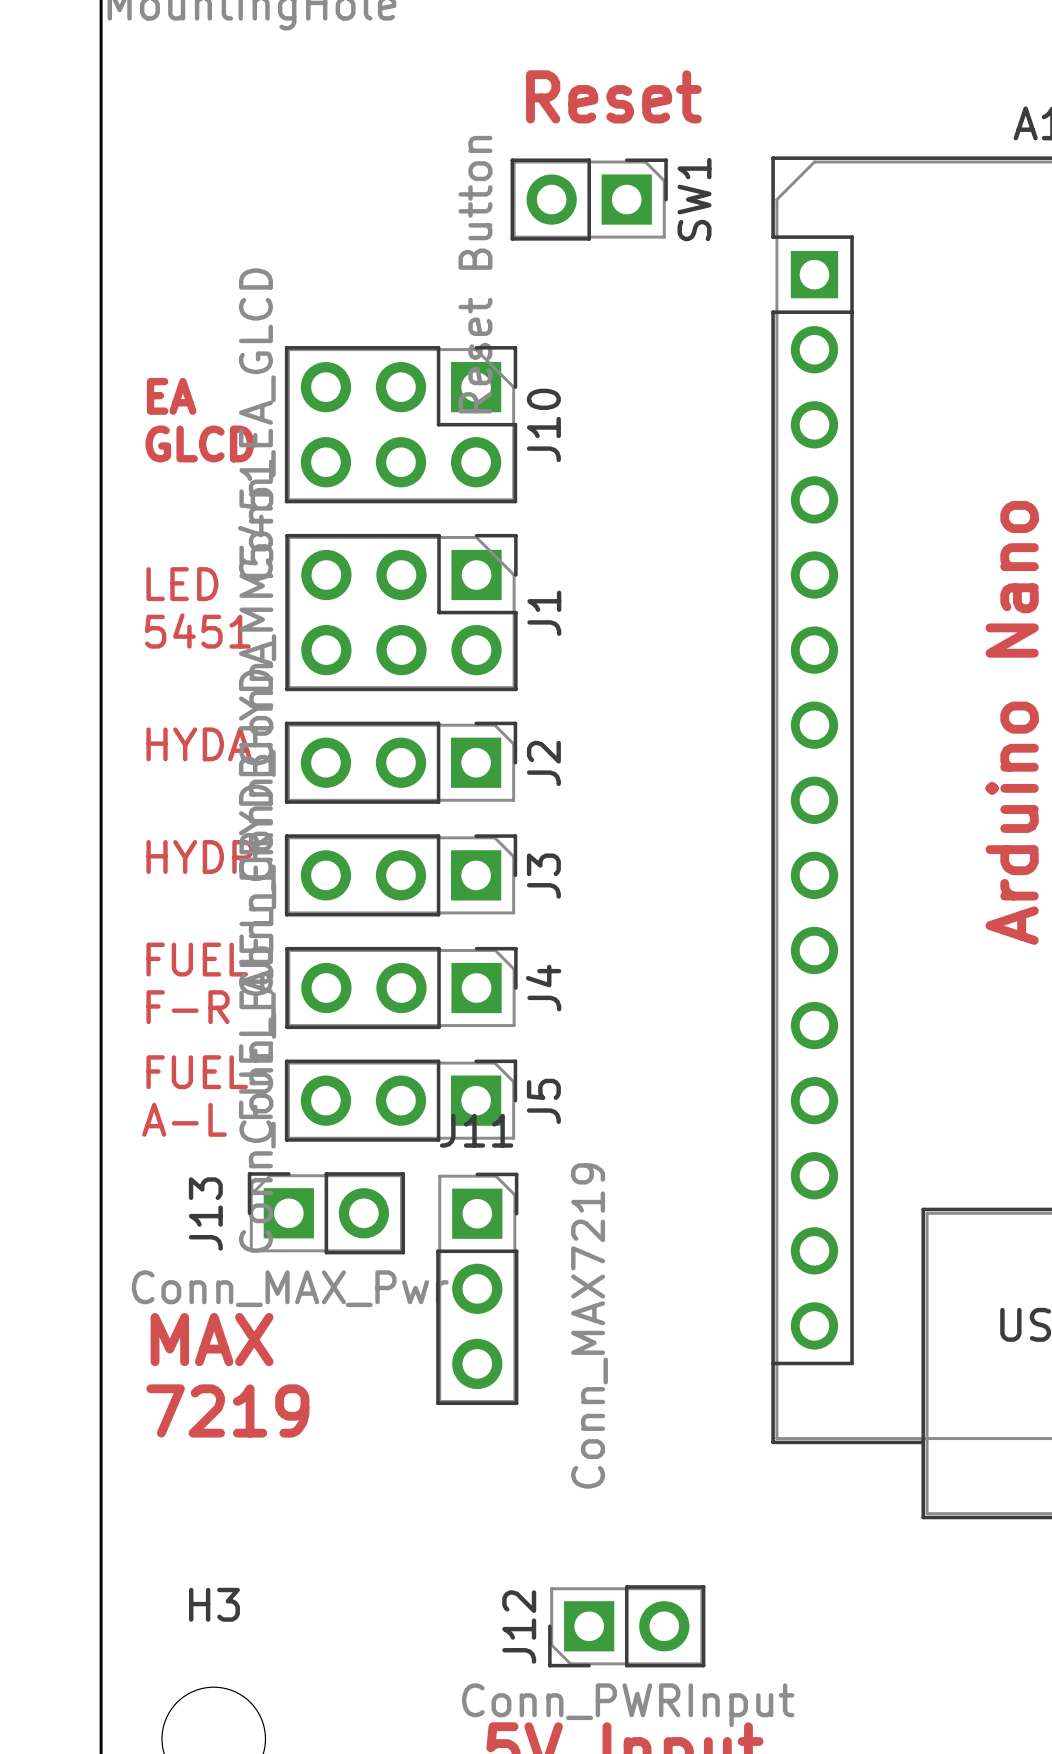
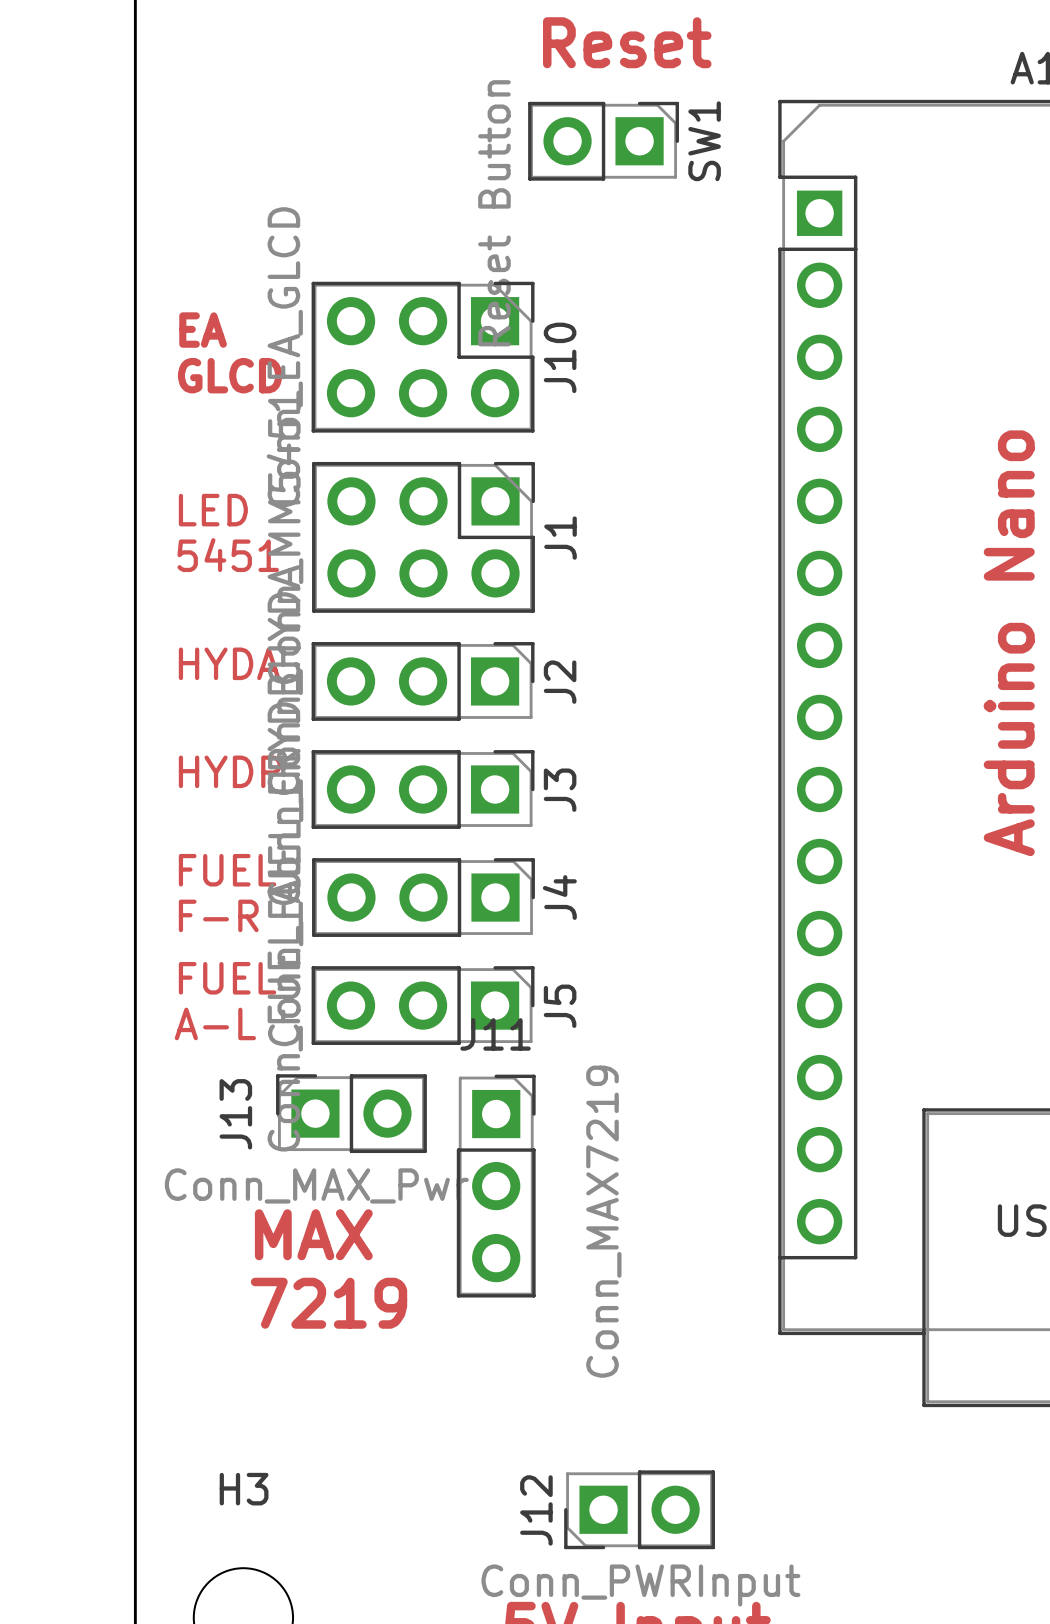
text position: MAX (212, 1339) -> MAX (313, 1234)
text position: 7219 (227, 1410) -> 7219 (329, 1303)

